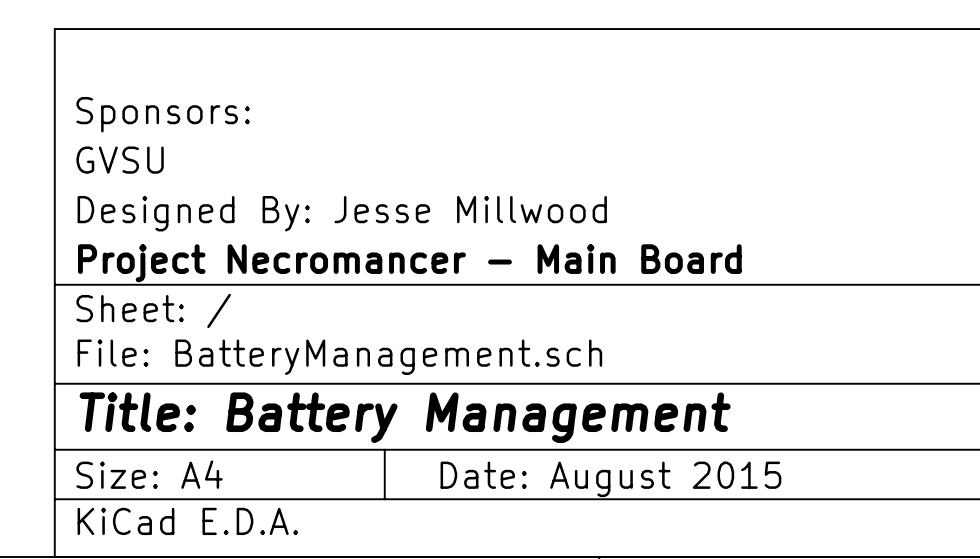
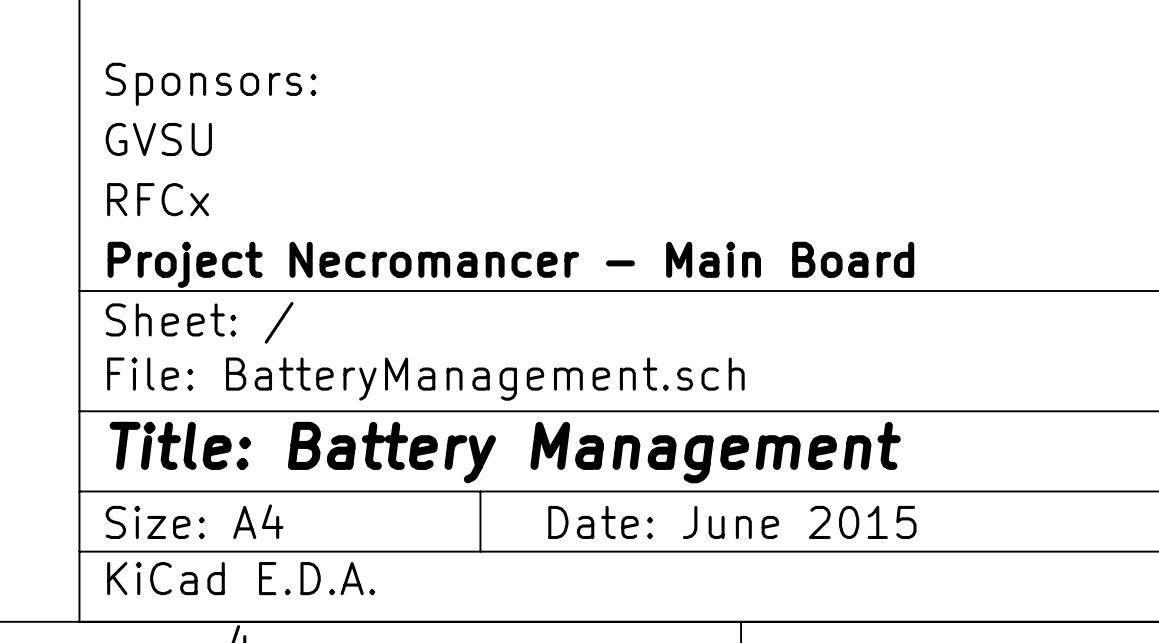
title block: Designed By: Jesse Millwood (342, 213) -> RFCx (158, 199)
title block: Date: August 2015 (610, 479) -> Date: June 2015 (732, 522)

